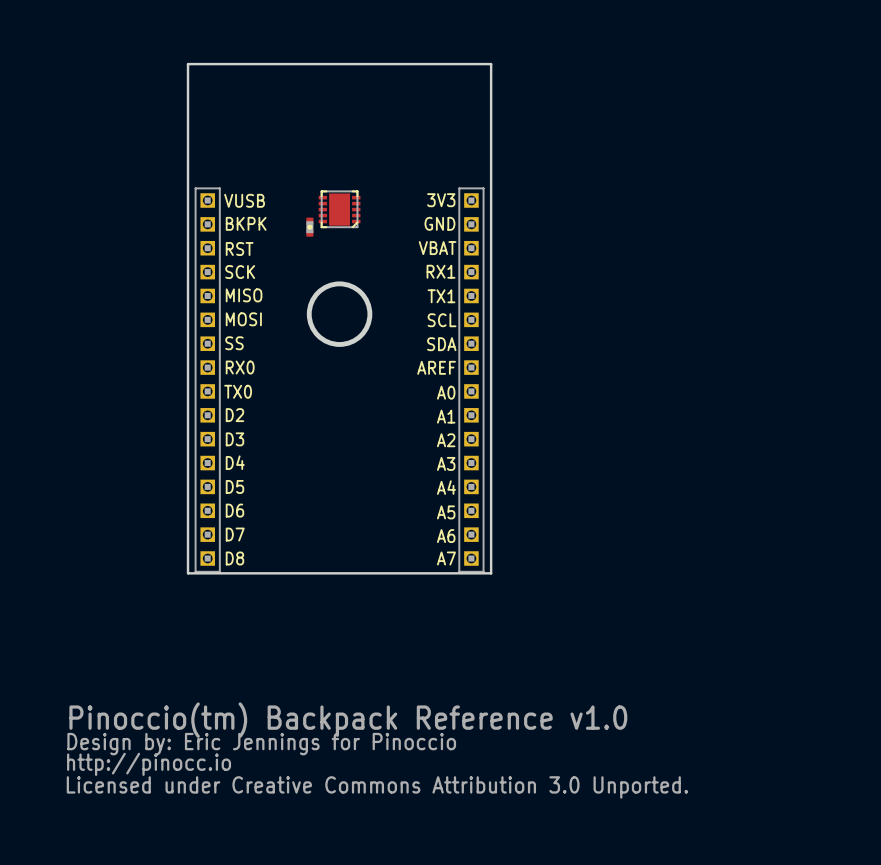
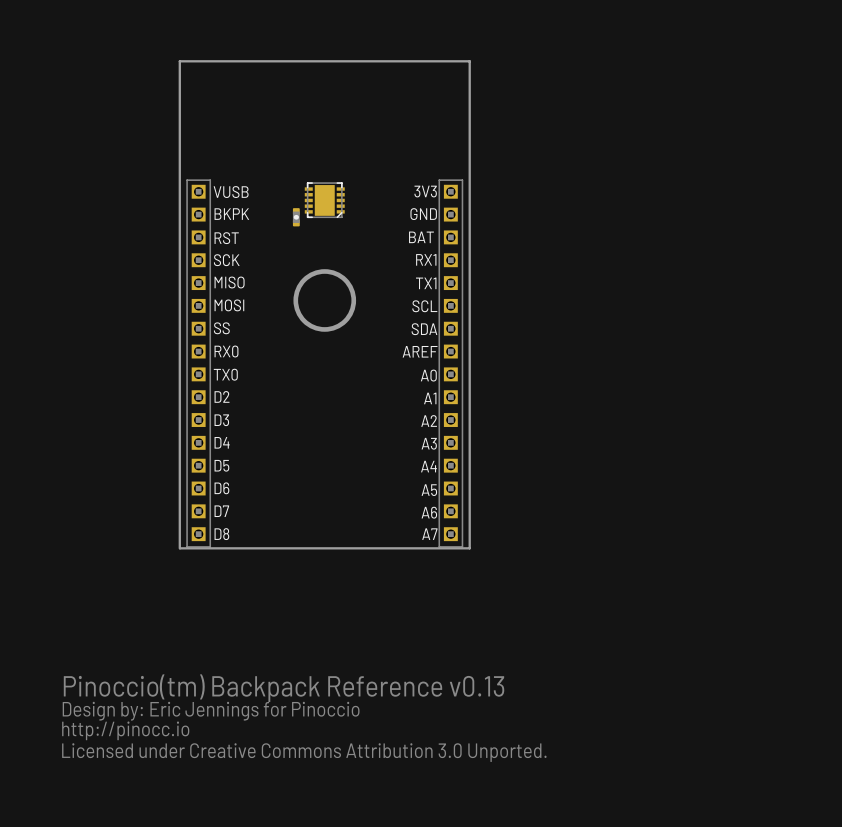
text: VBAT (437, 248) -> BAT (421, 237)
text: Pinoccio(tm) Backpack Reference v1.0 (348, 720) -> Pinoccio(tm) Backpack Reference v0.13 (284, 688)

